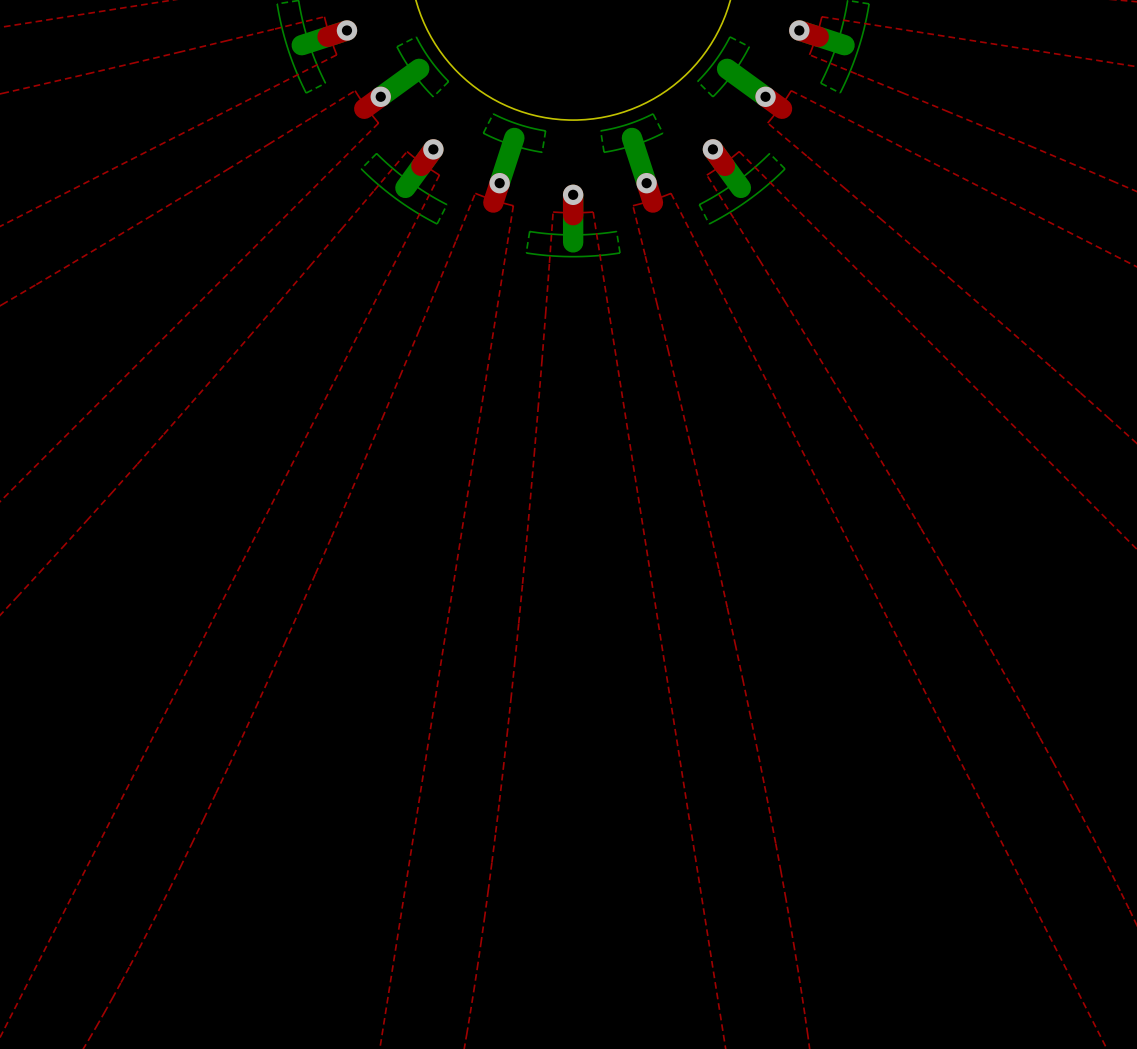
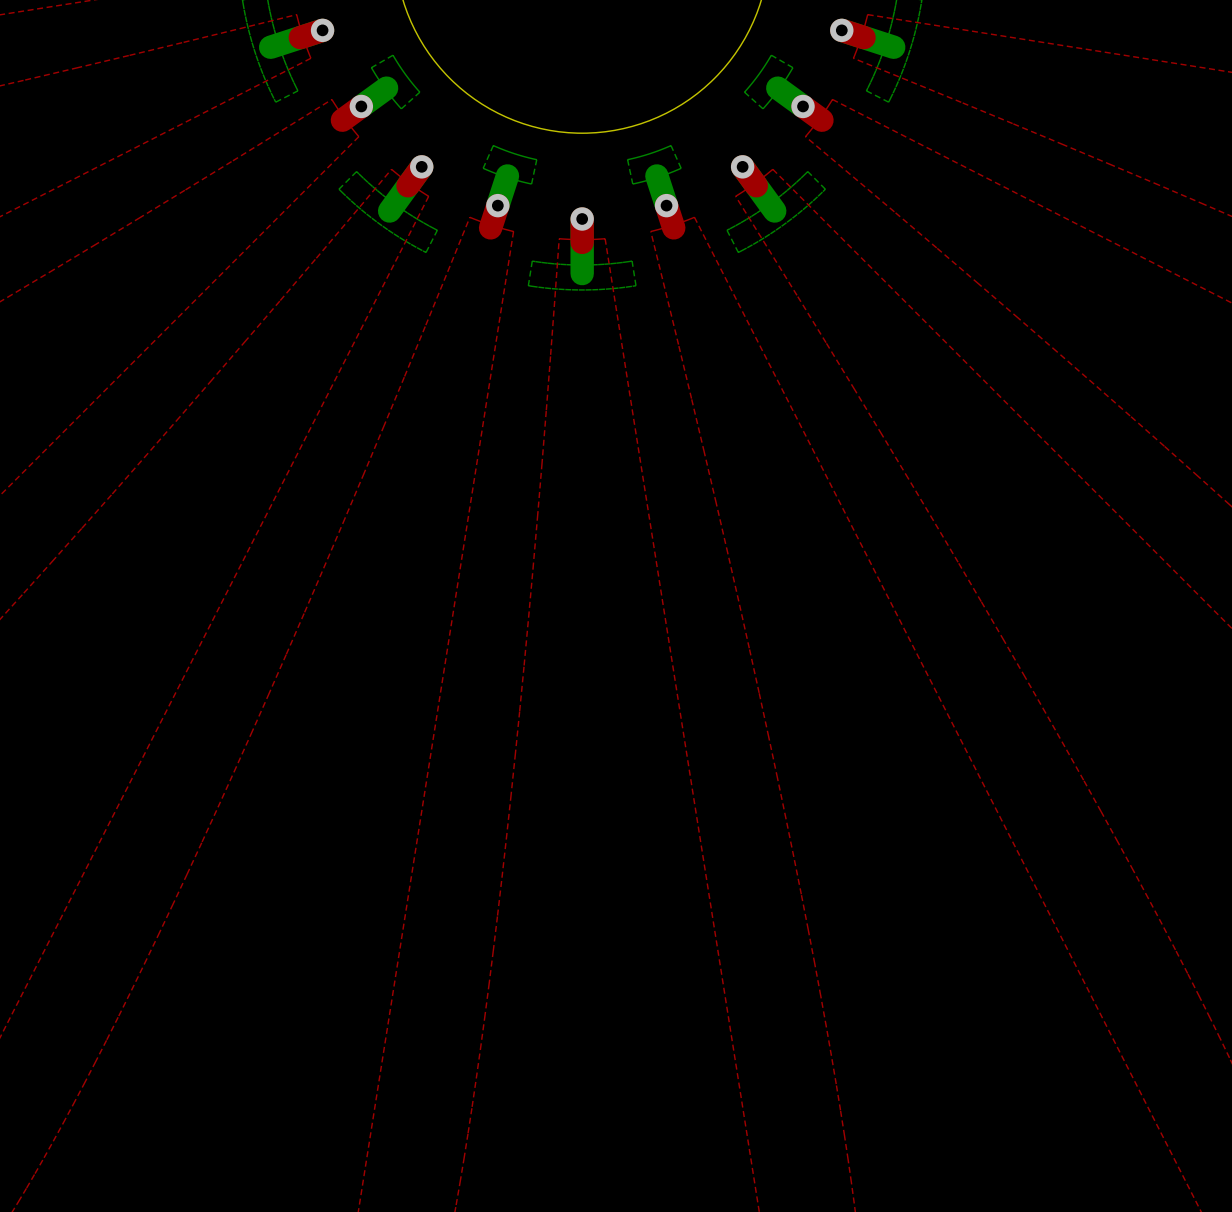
bottom zone outline: (416, 36) (396, 46) (413, 73) (433, 96) (448, 81) (430, 60) (416, 36) -> none
bottom zone outline: (730, 36) (715, 60) (697, 81) (712, 96) (733, 73) (749, 46) (730, 36) -> none
bottom zone outline: none -> (393, 55) (371, 67) (401, 108) (419, 92) (393, 55)
bottom zone outline: none -> (771, 55) (792, 67) (763, 108) (744, 92) (771, 55)
bottom track: (419, 68) (402, 80) -> none
bottom track: (727, 68) (743, 80) -> none
bottom zone outline: (493, 113) (483, 133) (512, 145) (542, 152) (545, 130) (518, 124) (493, 113) -> none
bottom zone outline: (653, 113) (627, 124) (600, 130) (604, 152) (634, 145) (662, 133) (653, 113) -> none
bottom zone outline: none -> (493, 145) (483, 168) (531, 184) (536, 159) (493, 145)
bottom zone outline: none -> (671, 145) (681, 168) (632, 184) (627, 159) (671, 145)
bottom track: (514, 137) (508, 157) -> none
bottom track: (631, 137) (638, 157) -> none

